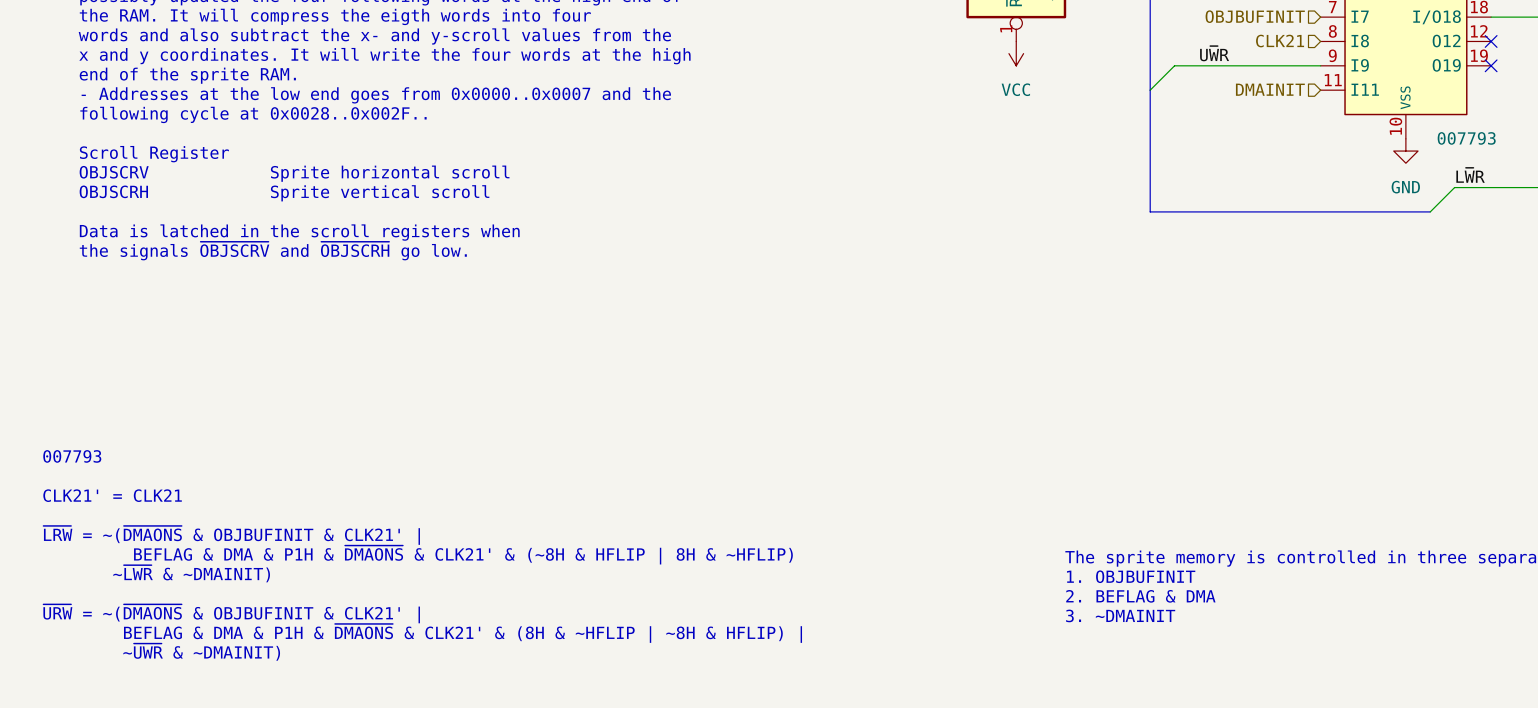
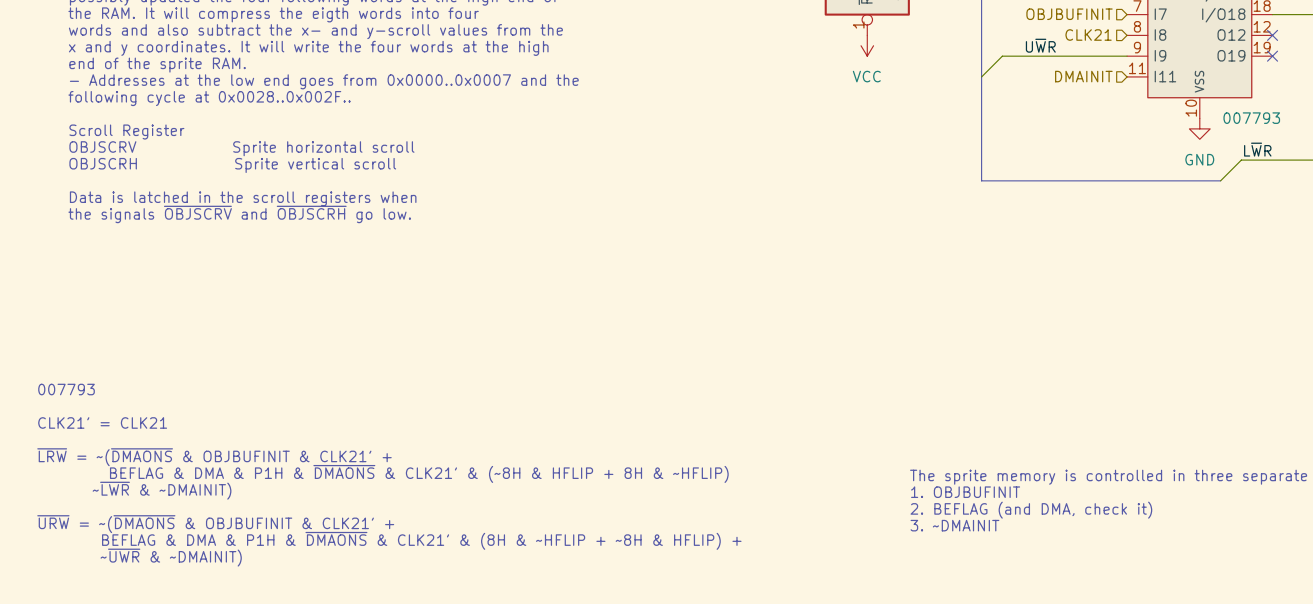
text: ~{LRW} = ~(~{DMAONS} & OBJBUFINIT & CLK21' | (231, 535) -> ~{LRW} = ~(~{DMAONS} & OBJBUFINIT & CLK21' + (214, 457)
text: BEFLAG & DMA & P1H & ~{DMAONS} & CLK21' & (~8H & HFLIP | 8H & ~HFLIP) (463, 555) -> BEFLAG & DMA & P1H & ~{DMAONS} & CLK21' & (~8H & HFLIP + 8H & ~HFLIP) (419, 473)
text: 2. BEFLAG & DMA (1140, 596) -> 2. BEFLAG (and DMA, check it) (1031, 510)
text: ~{URW} = ~(~{DMAONS} & OBJBUFINIT & CLK21' | (231, 613) -> ~{URW} = ~(~{DMAONS} & OBJBUFINIT & CLK21' + (215, 524)
text: BEFLAG & DMA & P1H & ~{DMAONS} & CLK21' & (8H & ~HFLIP | ~8H & HFLIP) | (463, 633) -> BEFLAG & DMA & P1H & ~{DMAONS} & CLK21' & (8H & ~HFLIP + ~8H & HFLIP) + (421, 540)

